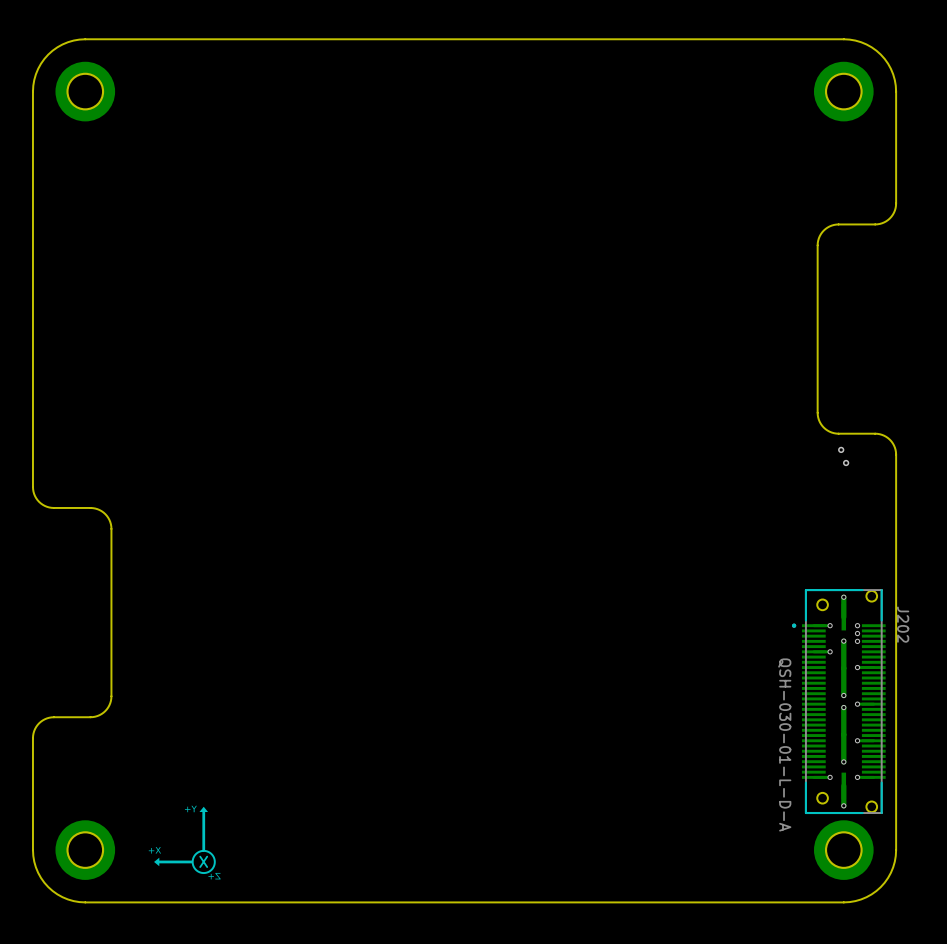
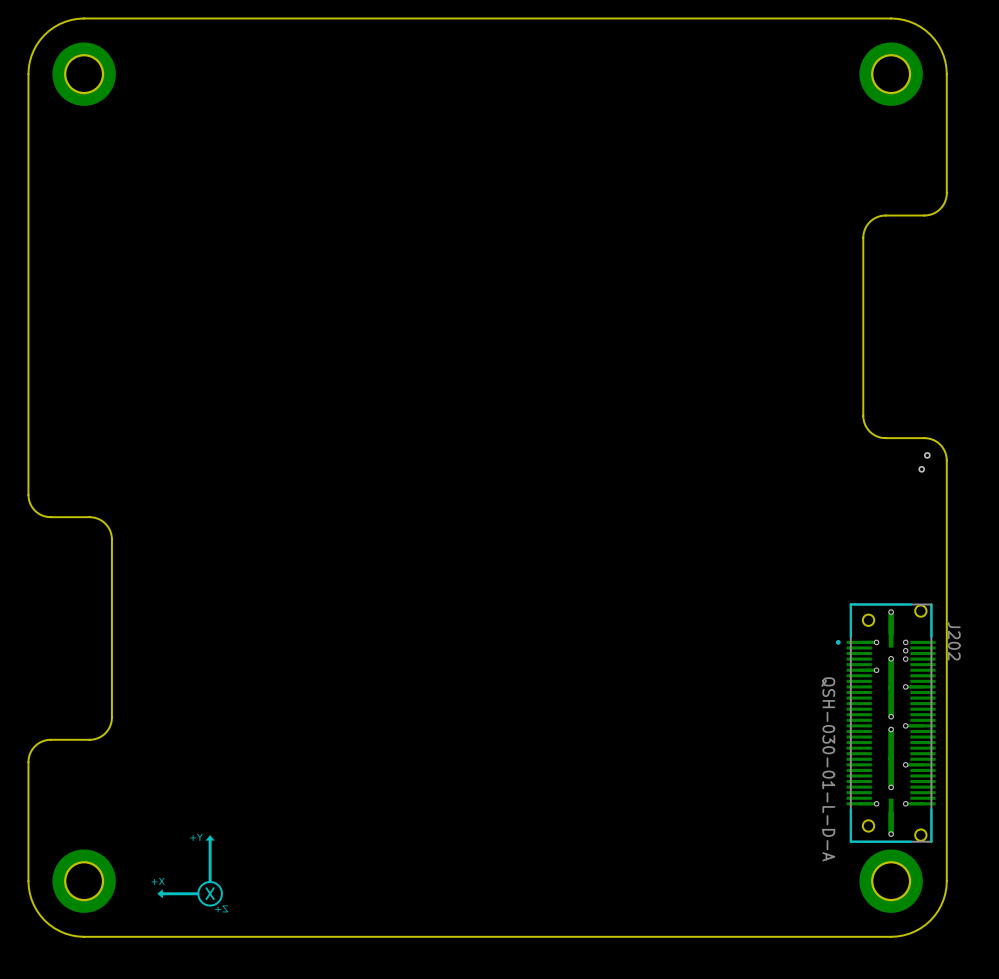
via: (841, 449) -> none
via: none -> (927, 455)
via: (846, 462) -> none
via: none -> (921, 469)

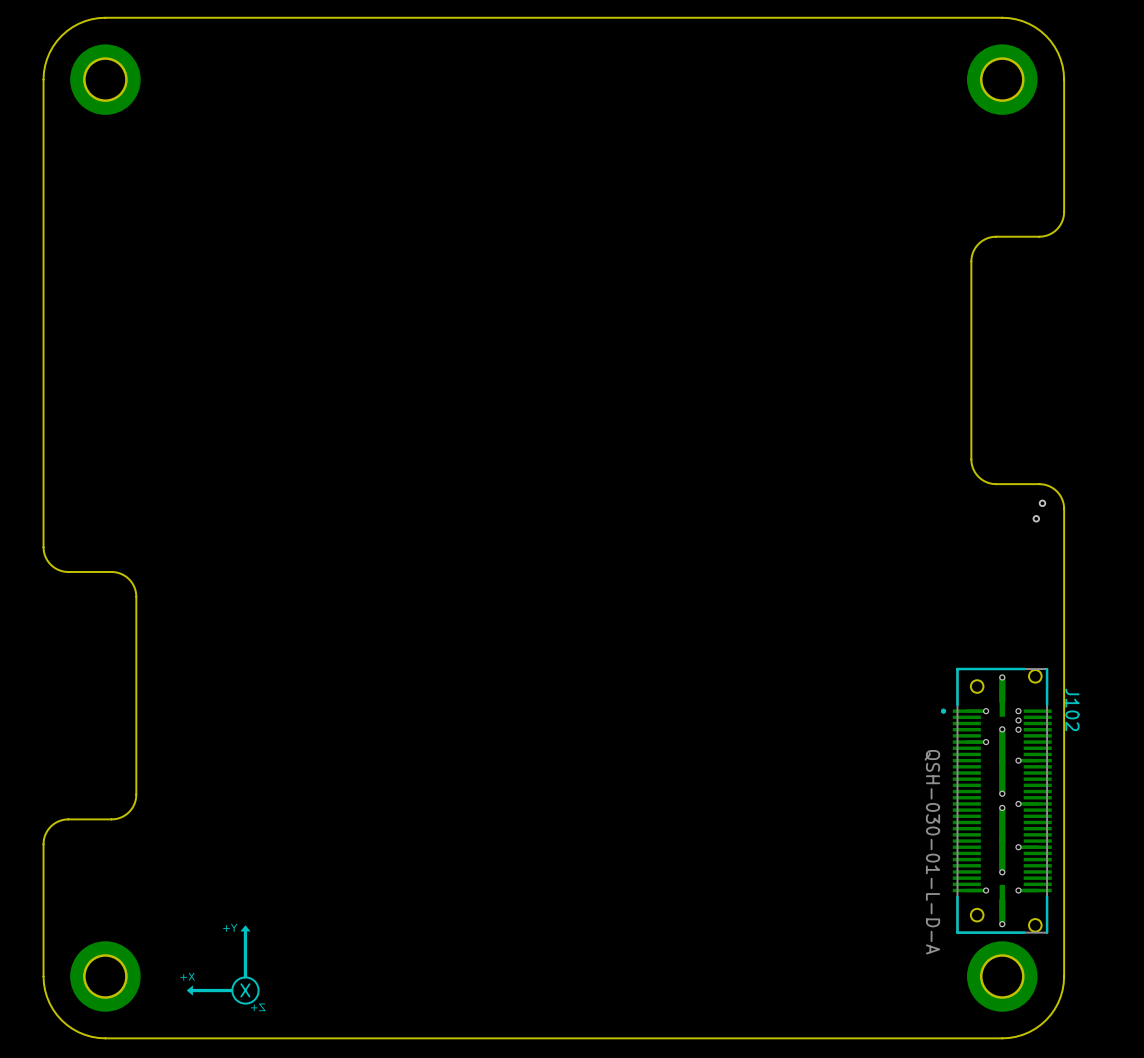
J202 name: J202 (954, 641) -> J102 (1072, 709)

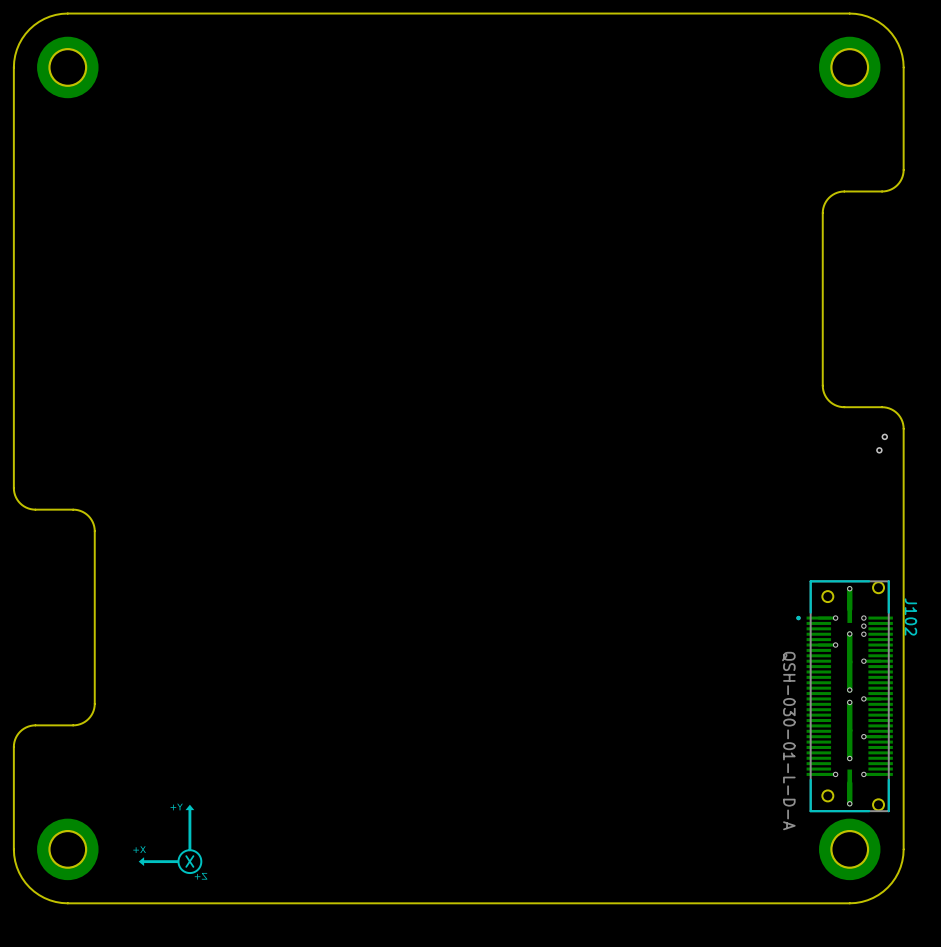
part footprint: [43, 17, 1065, 1039] -> [13, 13, 904, 904]

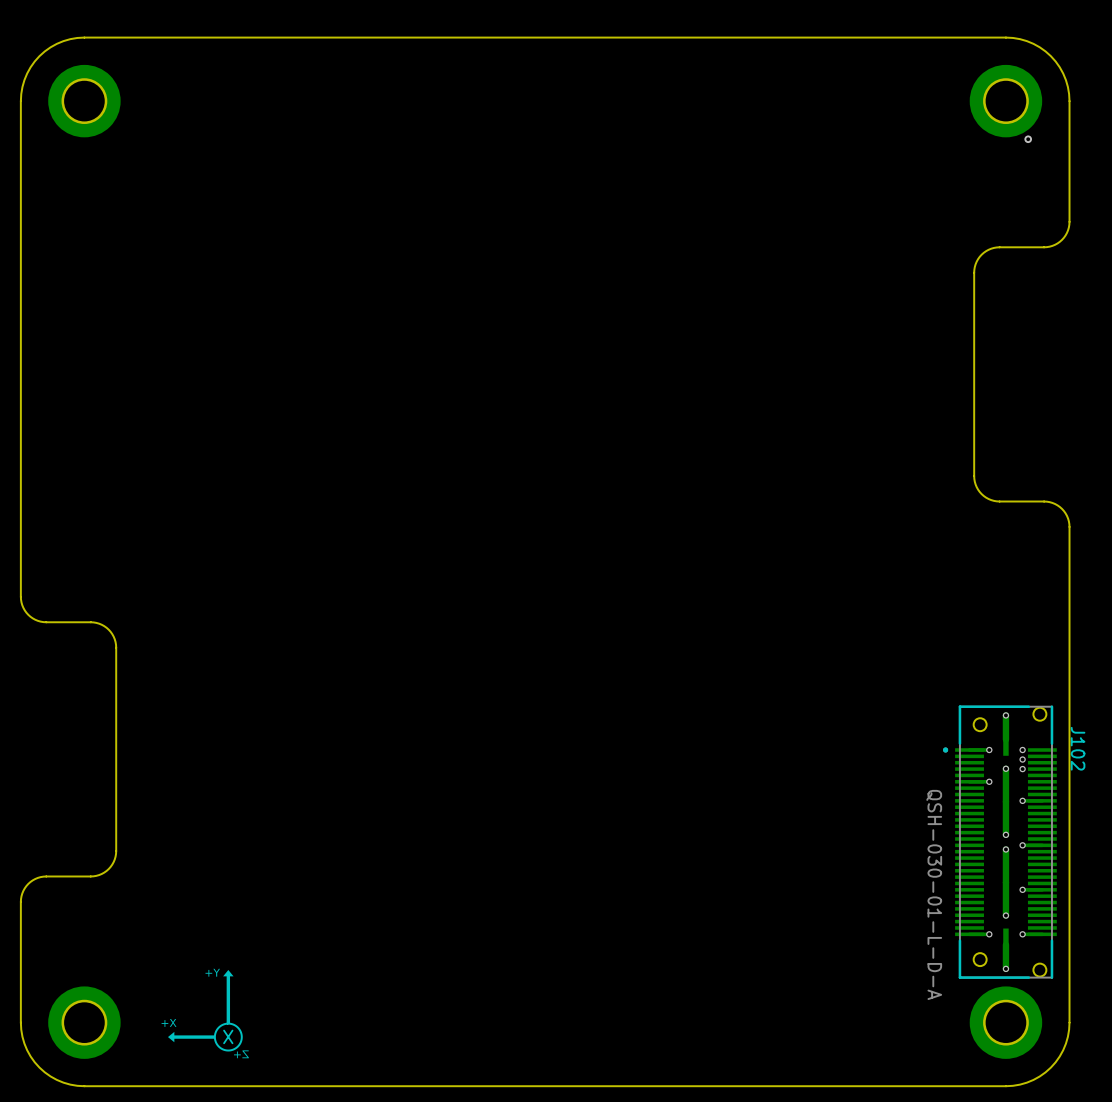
via: none -> (1028, 139)
via: (884, 436) -> none
via: (879, 450) -> none

